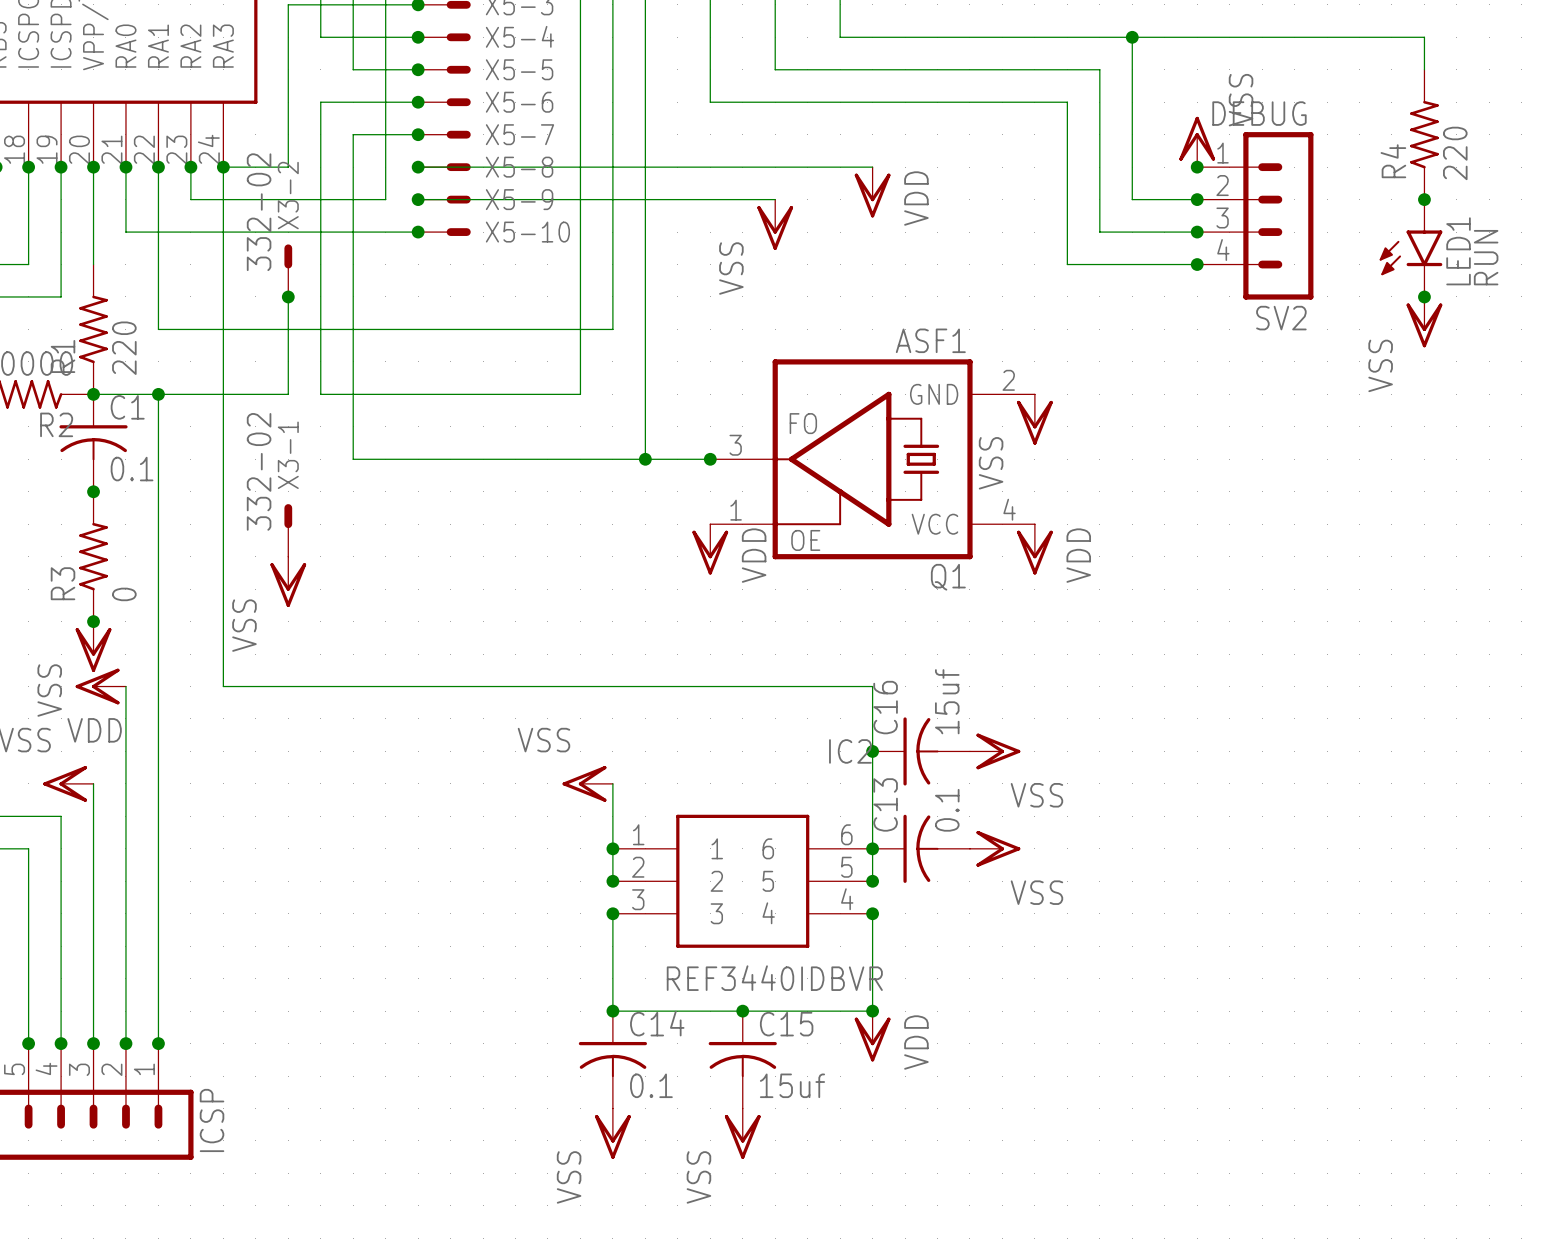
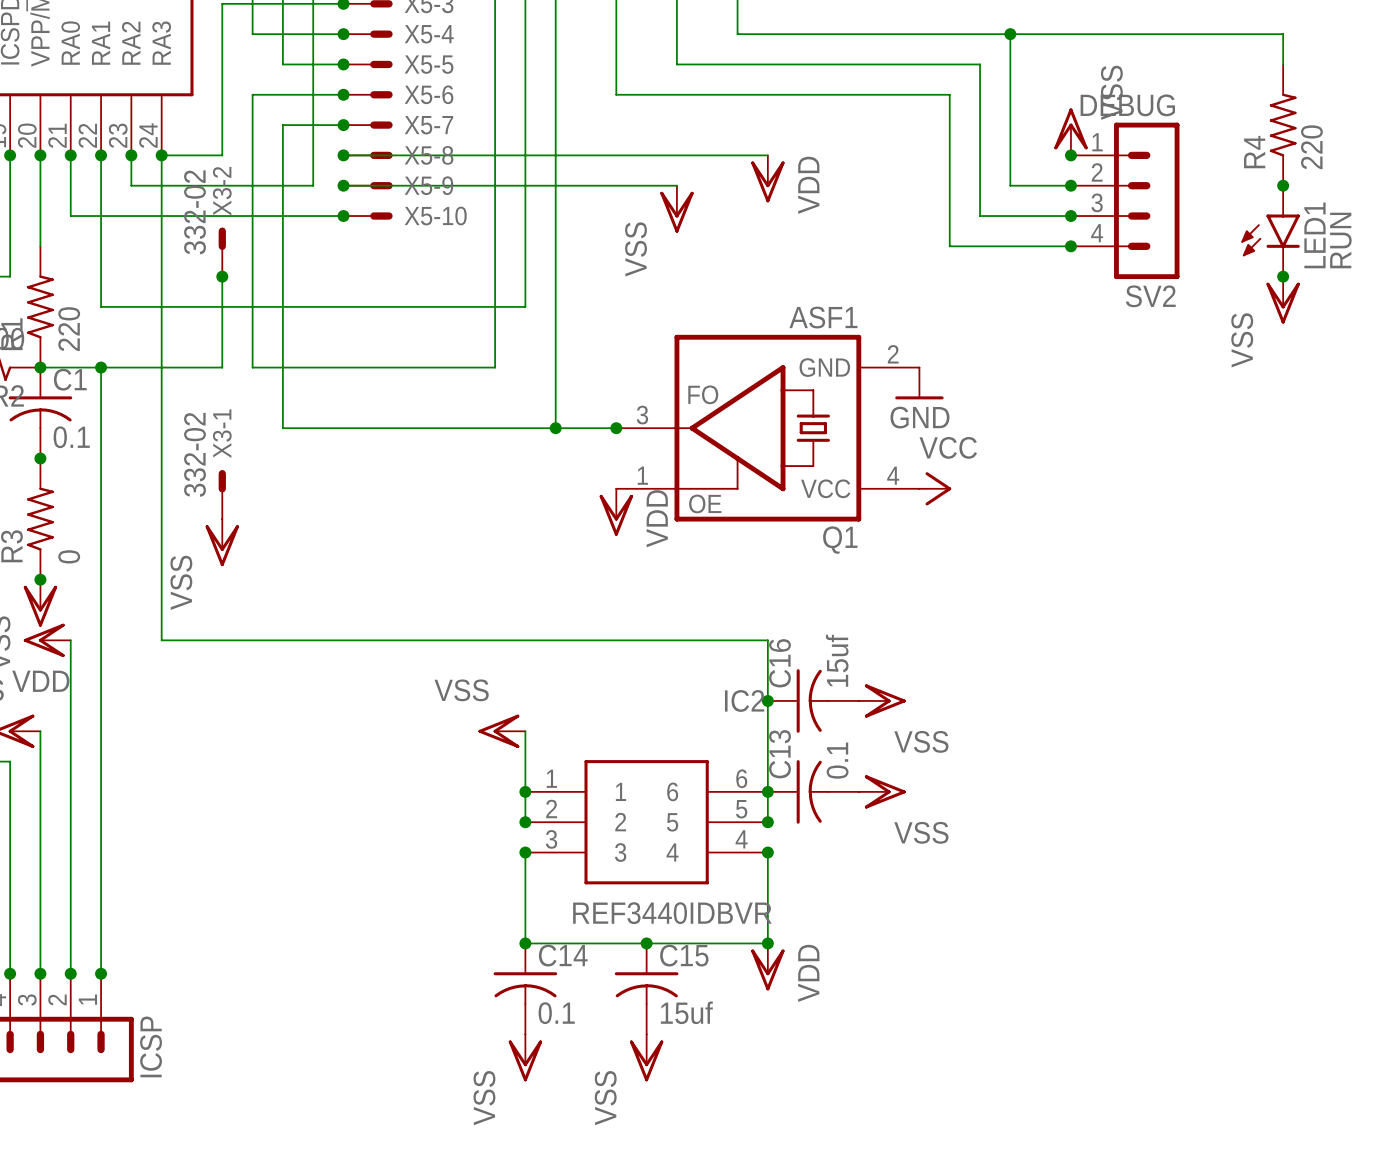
power symbol: VSS (1034, 419) -> GND (919, 383)
power symbol: none -> VCC (935, 488)
power symbol: VDD (1034, 549) -> none

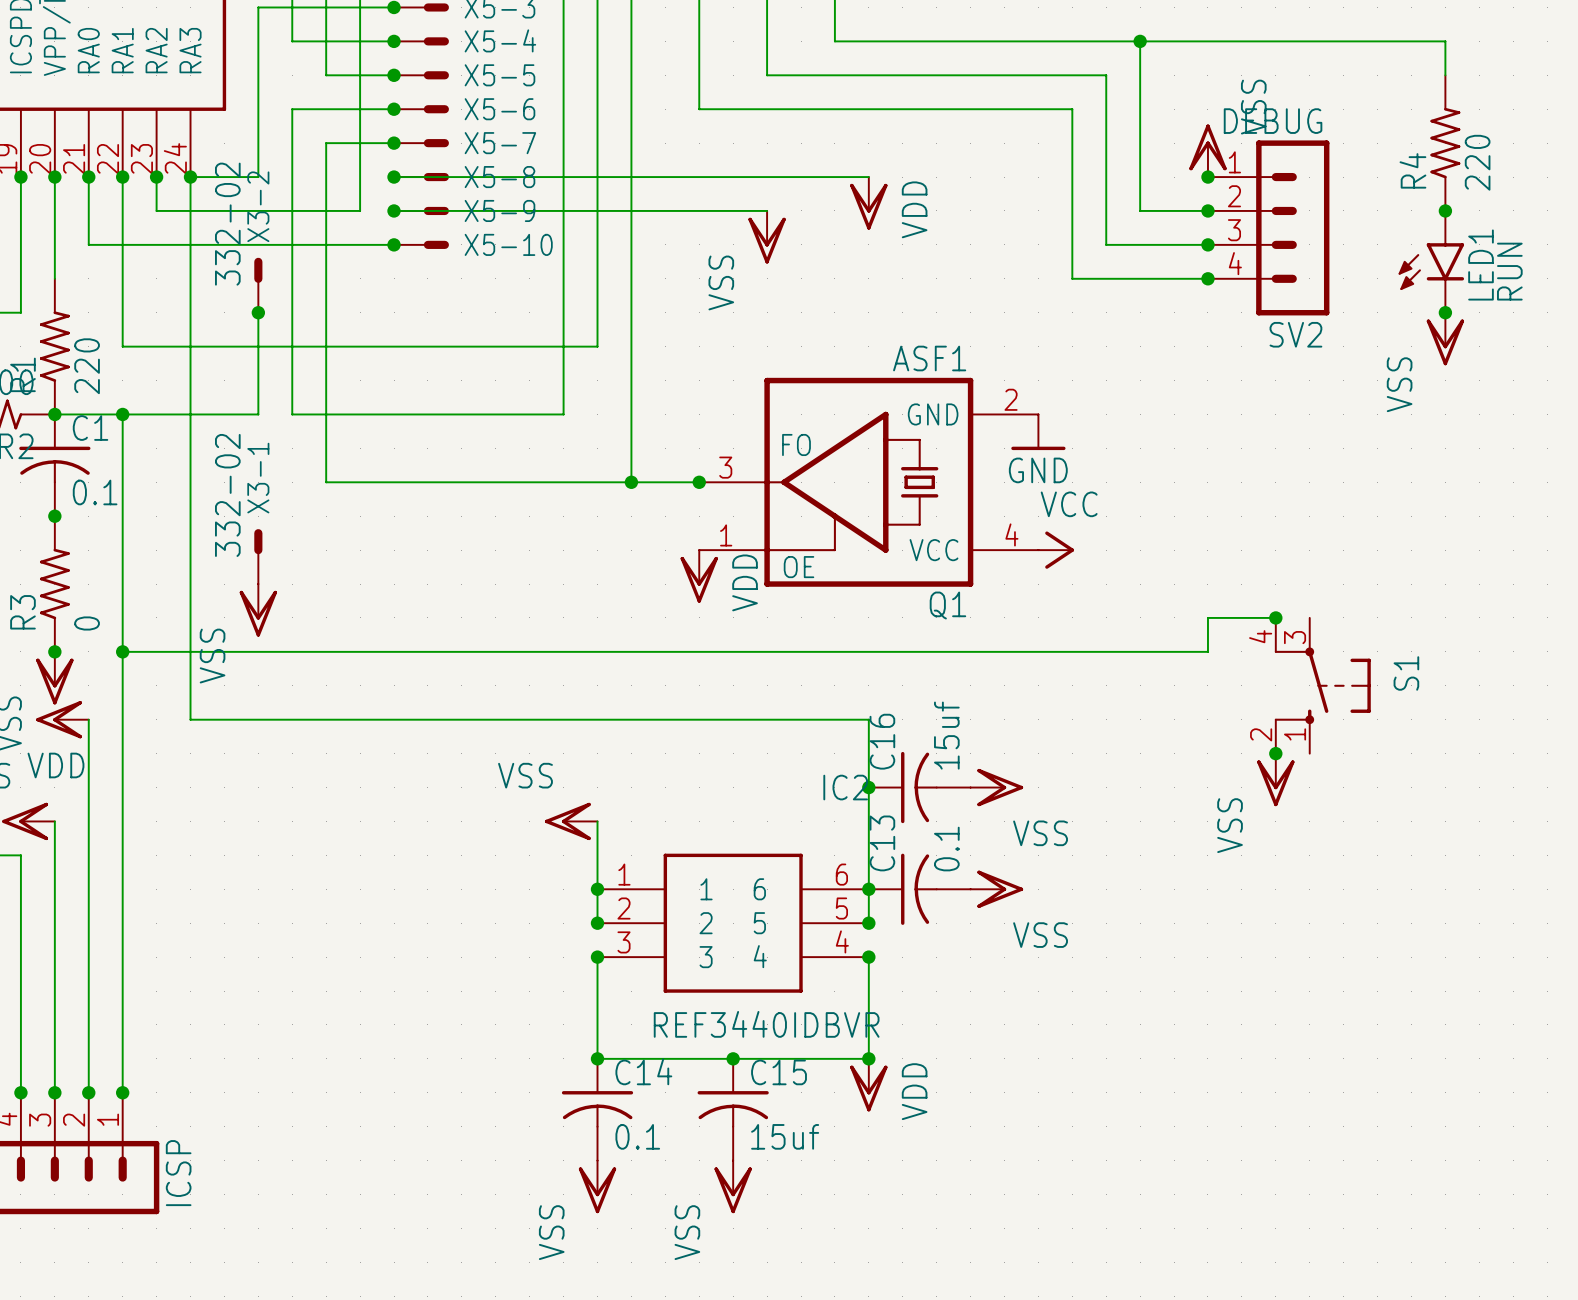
wire: none -> (1275, 617) (1207, 617) (1207, 651) (122, 651)
junction: none -> (1275, 617)
junction: none -> (122, 651)
S1: none -> (1322, 685)
junction: none -> (1275, 753)
power symbol: none -> VSS (1275, 779)

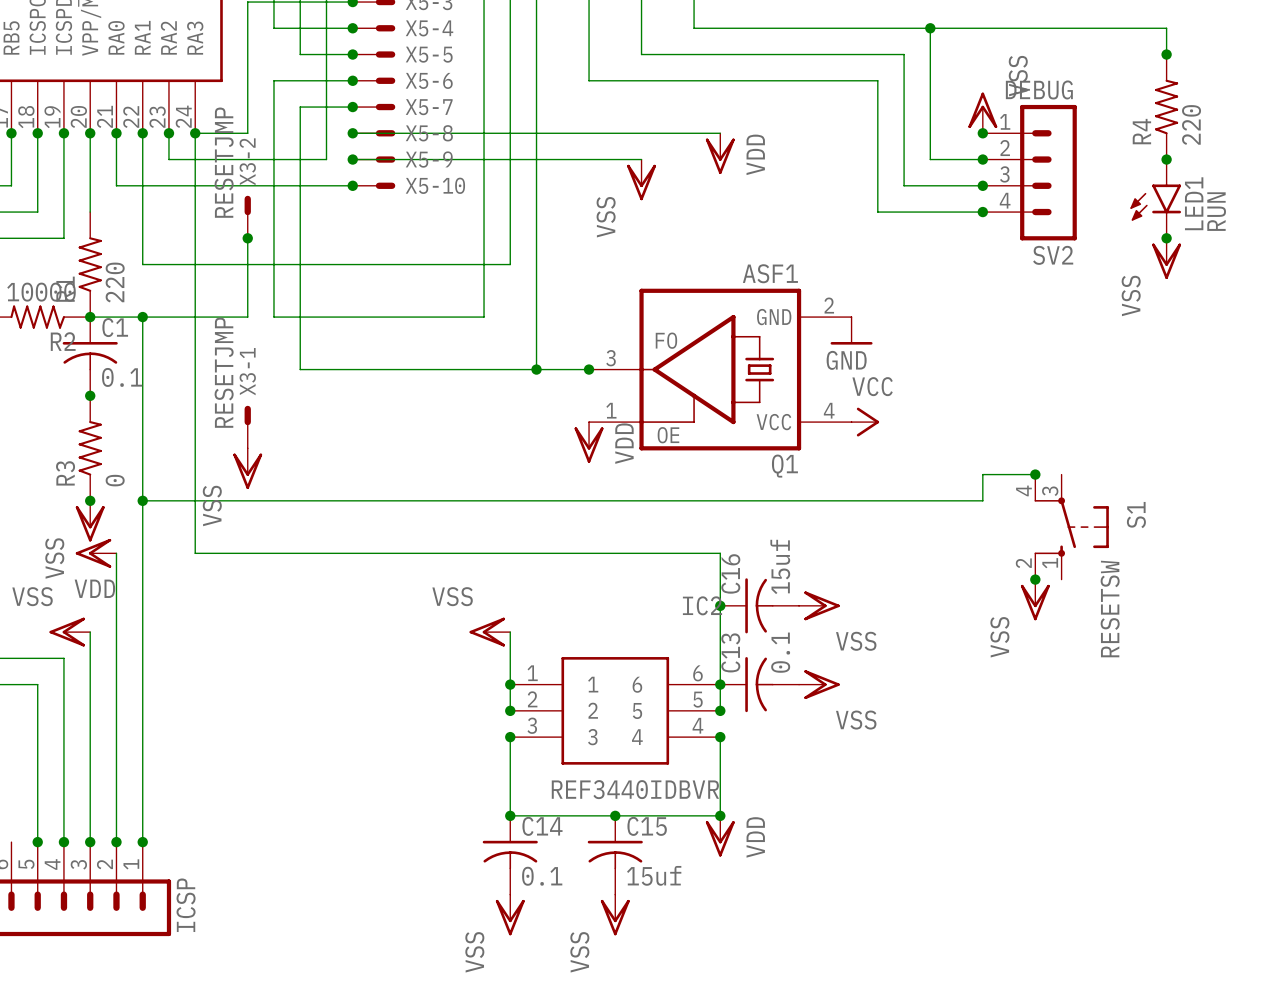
junction: none -> (1166, 54)
X3-2 value: 332-02 (227, 224) -> RESETJMP (224, 162)
X3-1 value: 332-02 (227, 495) -> RESETJMP (224, 372)
S1 value: none -> RESETSW (1110, 609)

